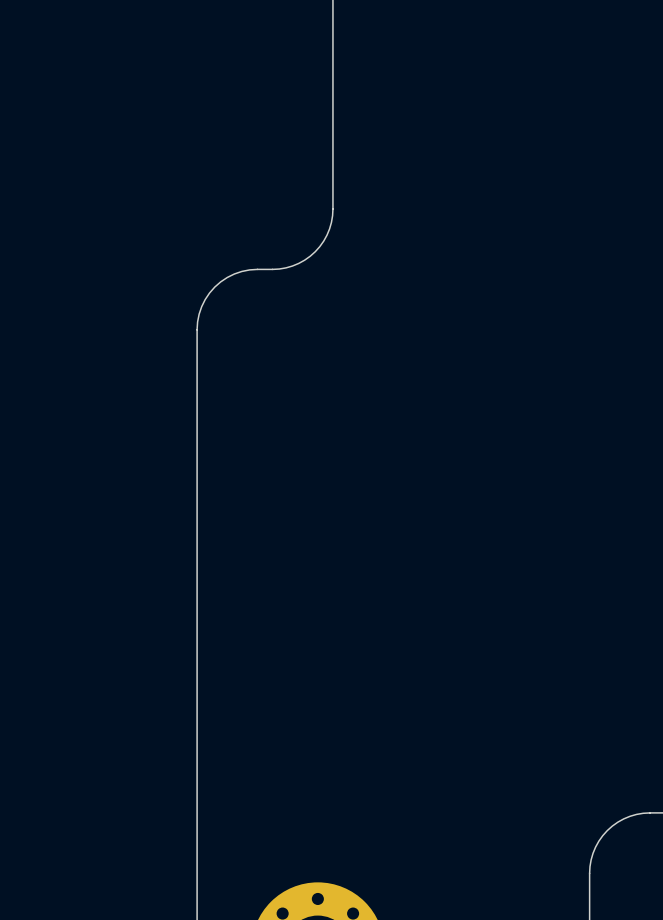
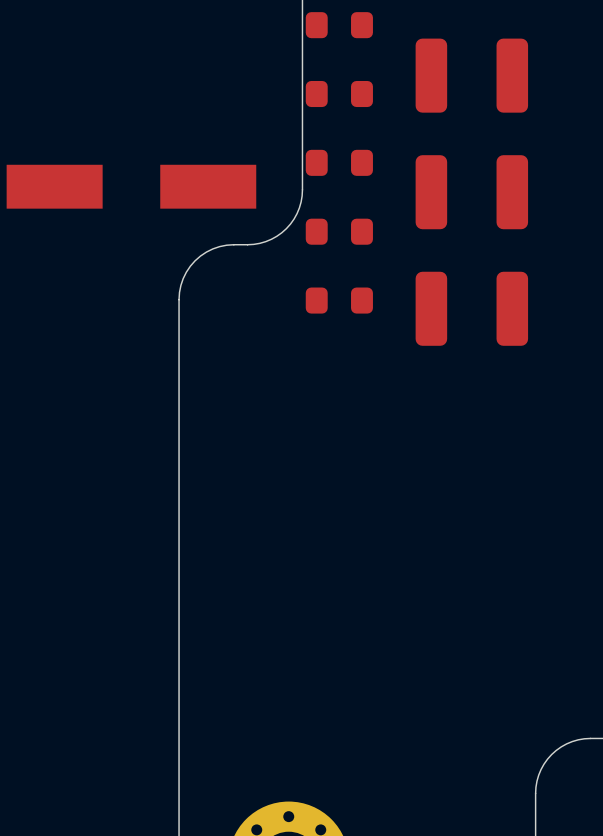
part: none -> (339, 25)
part: none -> (471, 75)
part: none -> (339, 94)
part: none -> (339, 162)
part: none -> (131, 186)
part: none -> (471, 192)
part: none -> (339, 231)
part: none -> (339, 300)
part: none -> (471, 308)

